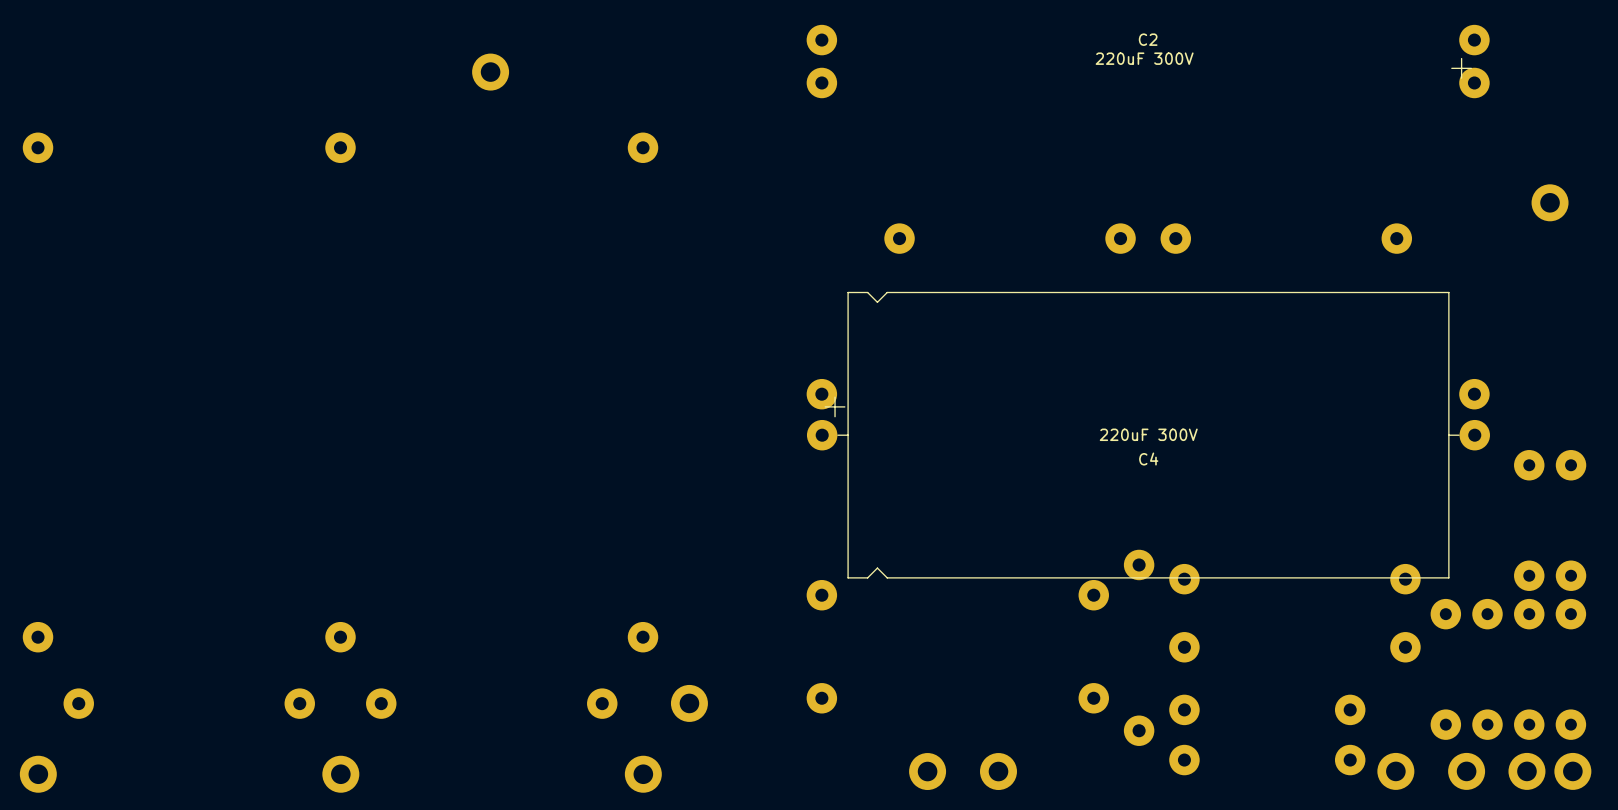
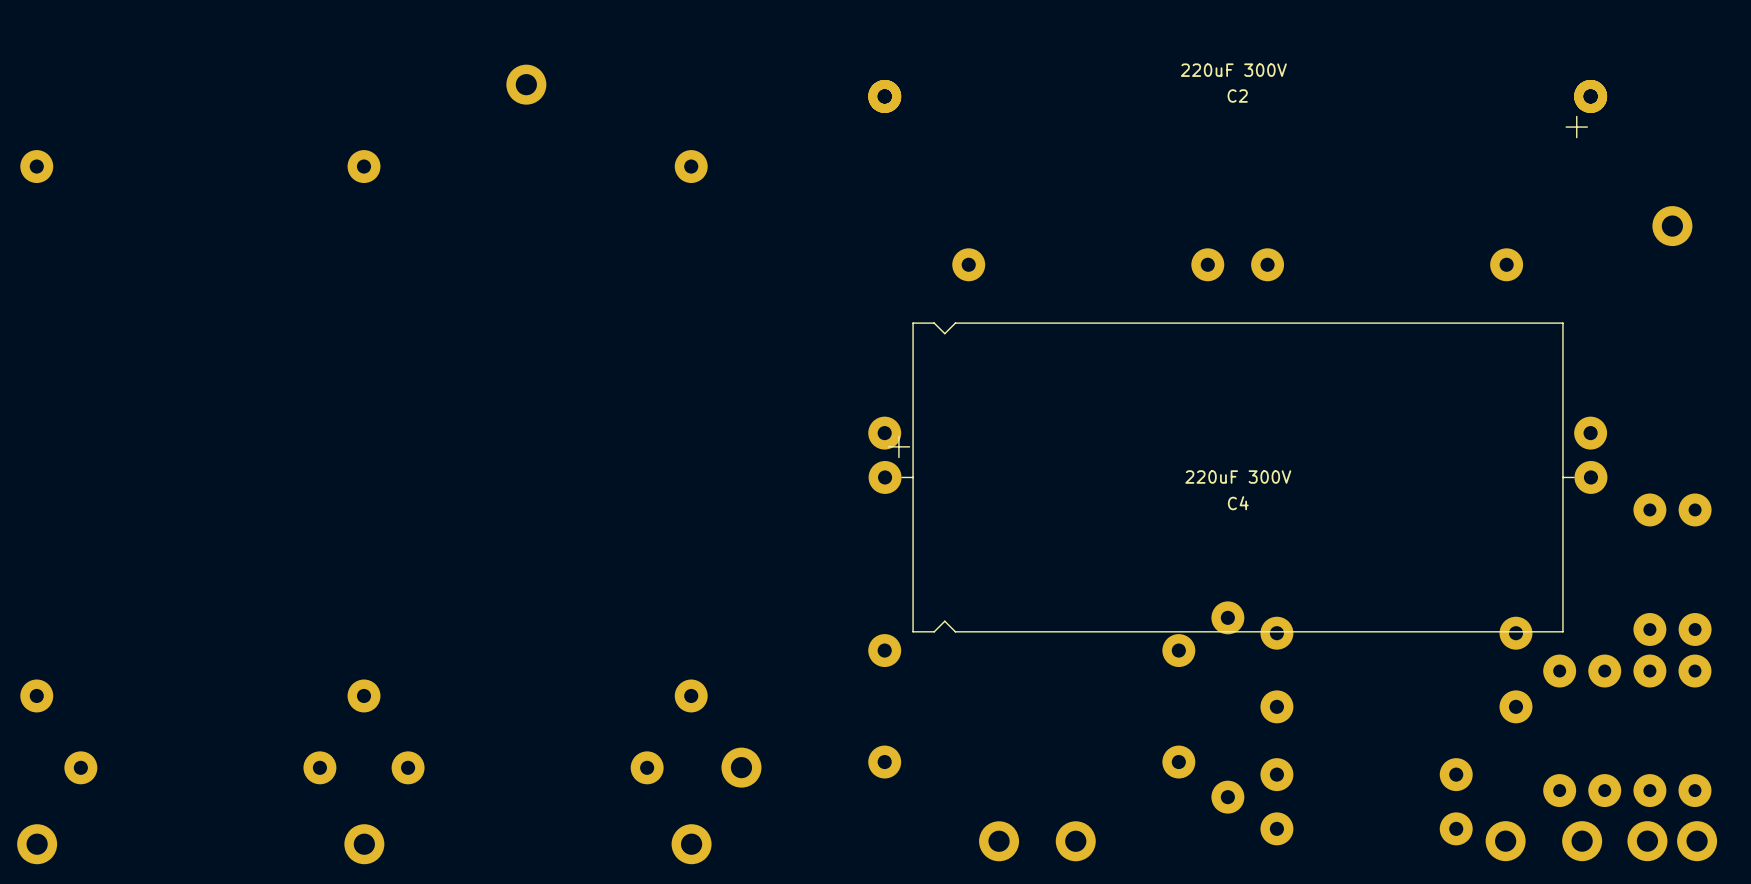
C2 position: (1148, 51) -> (1237, 109)

